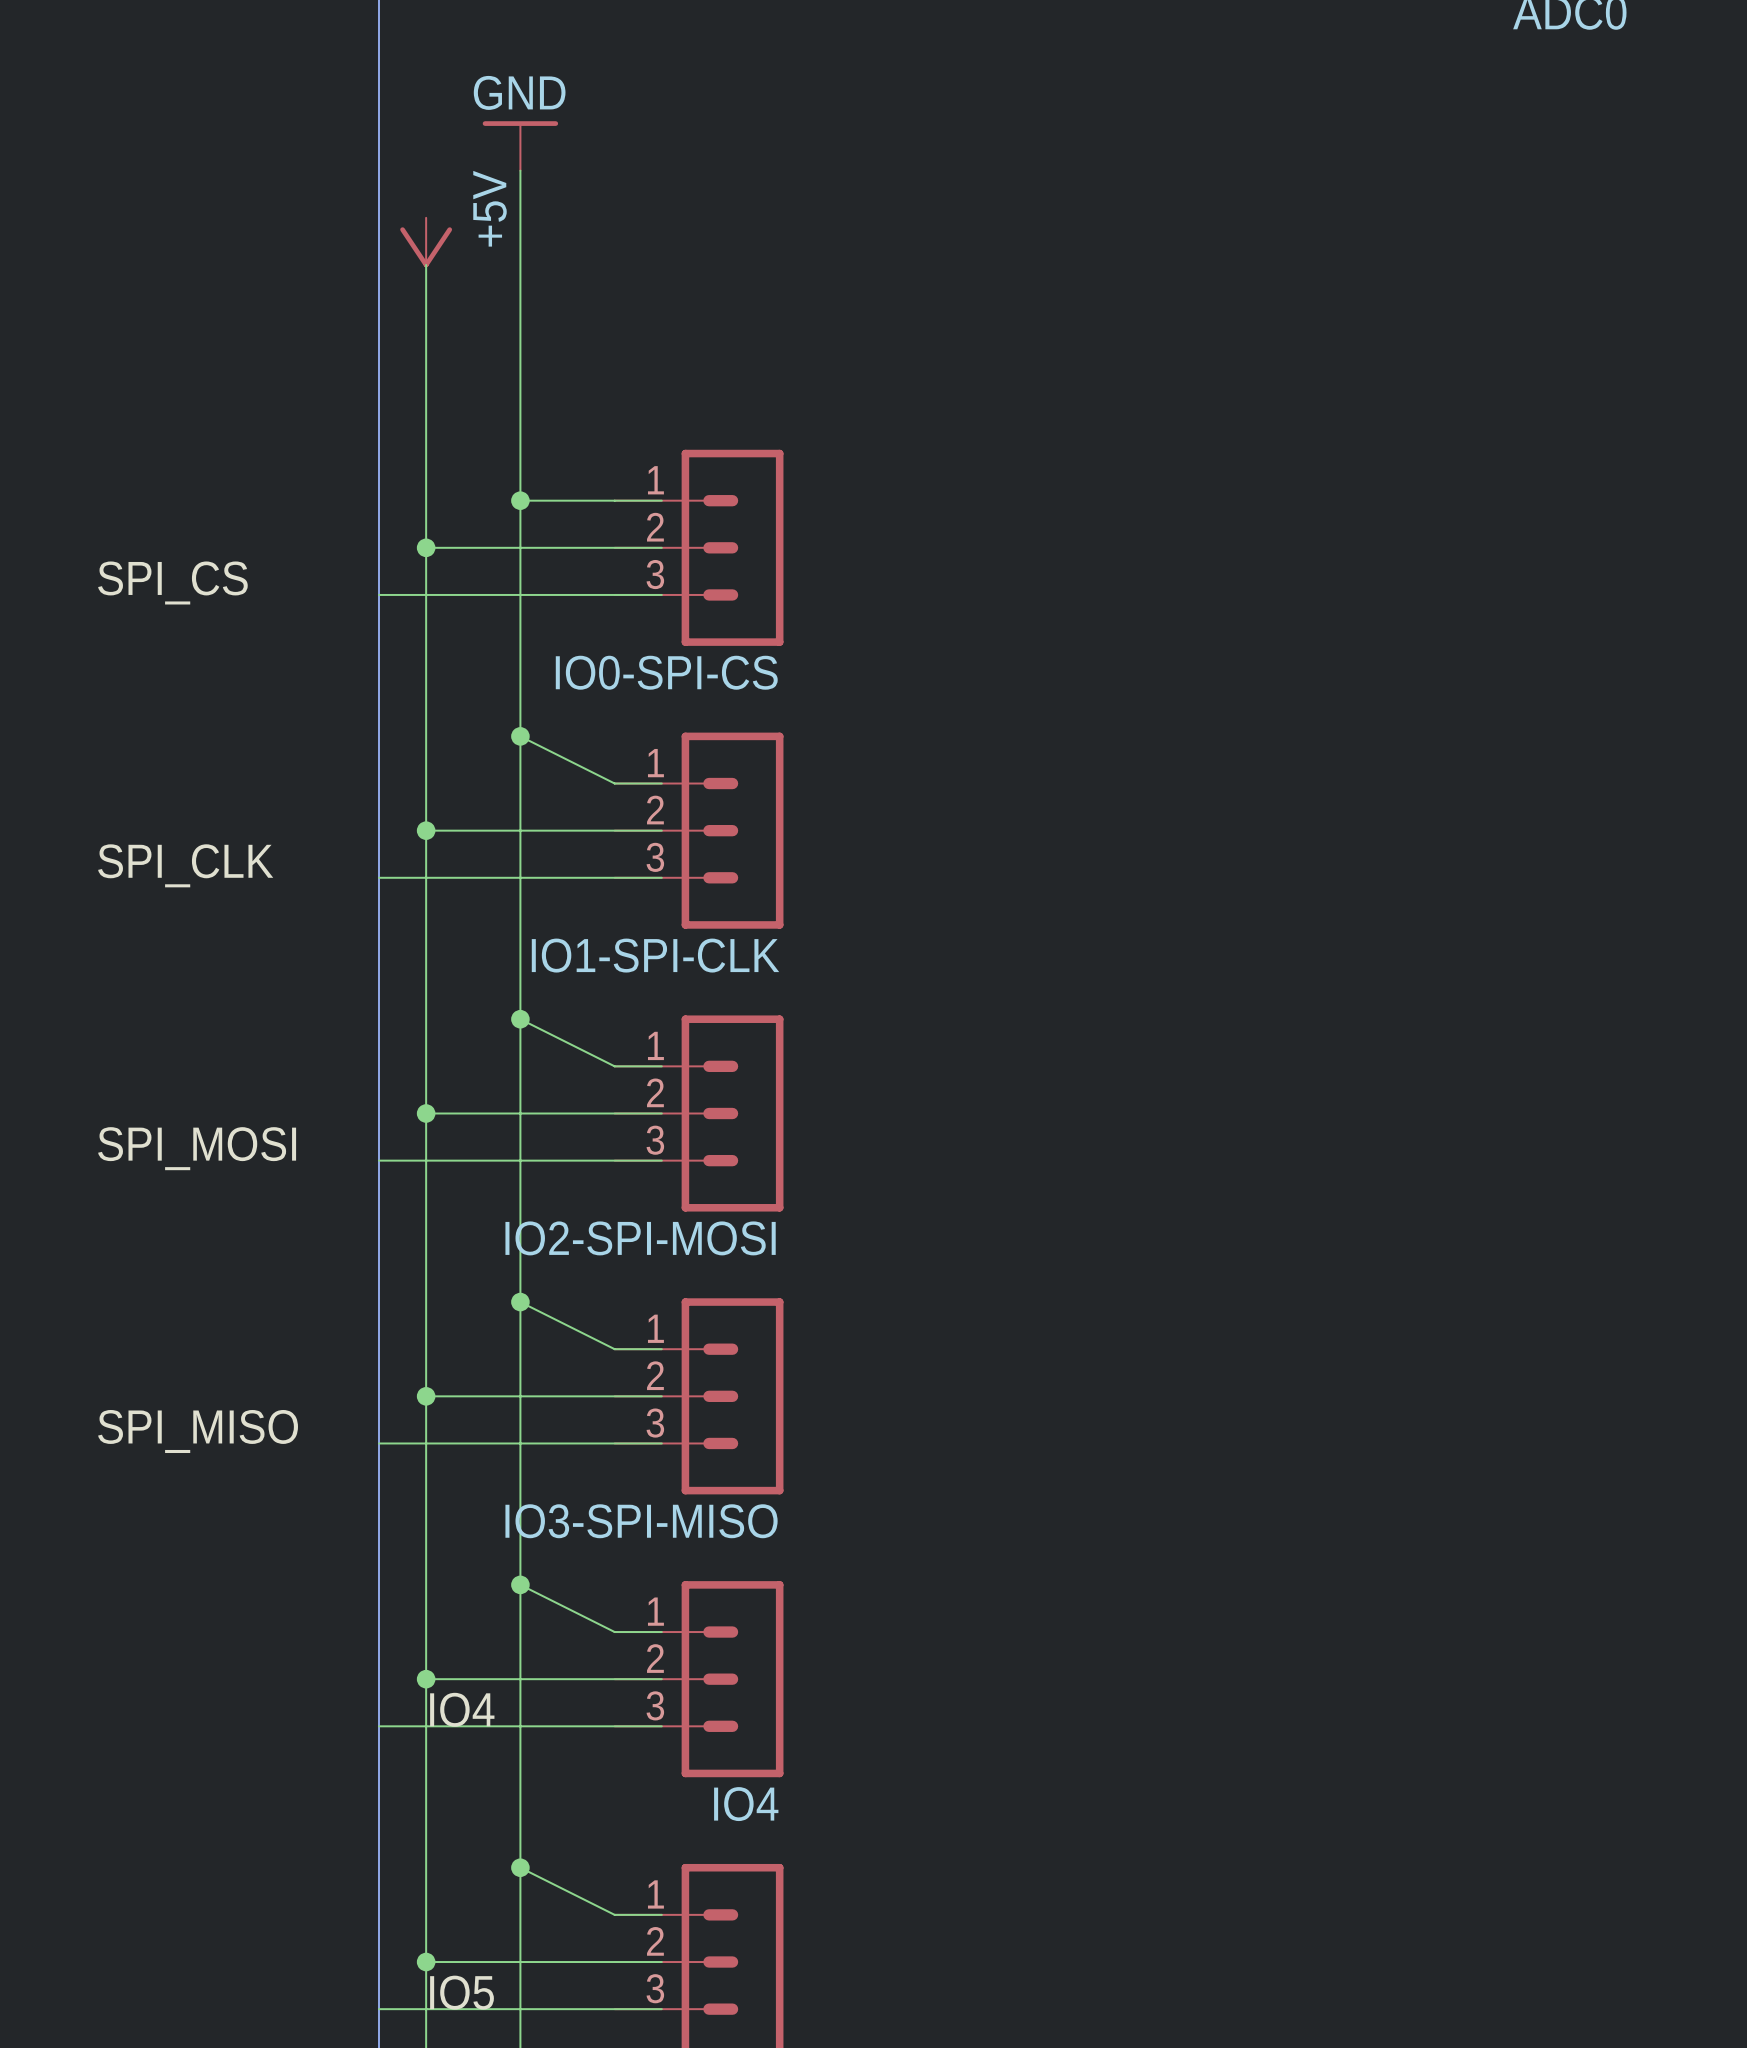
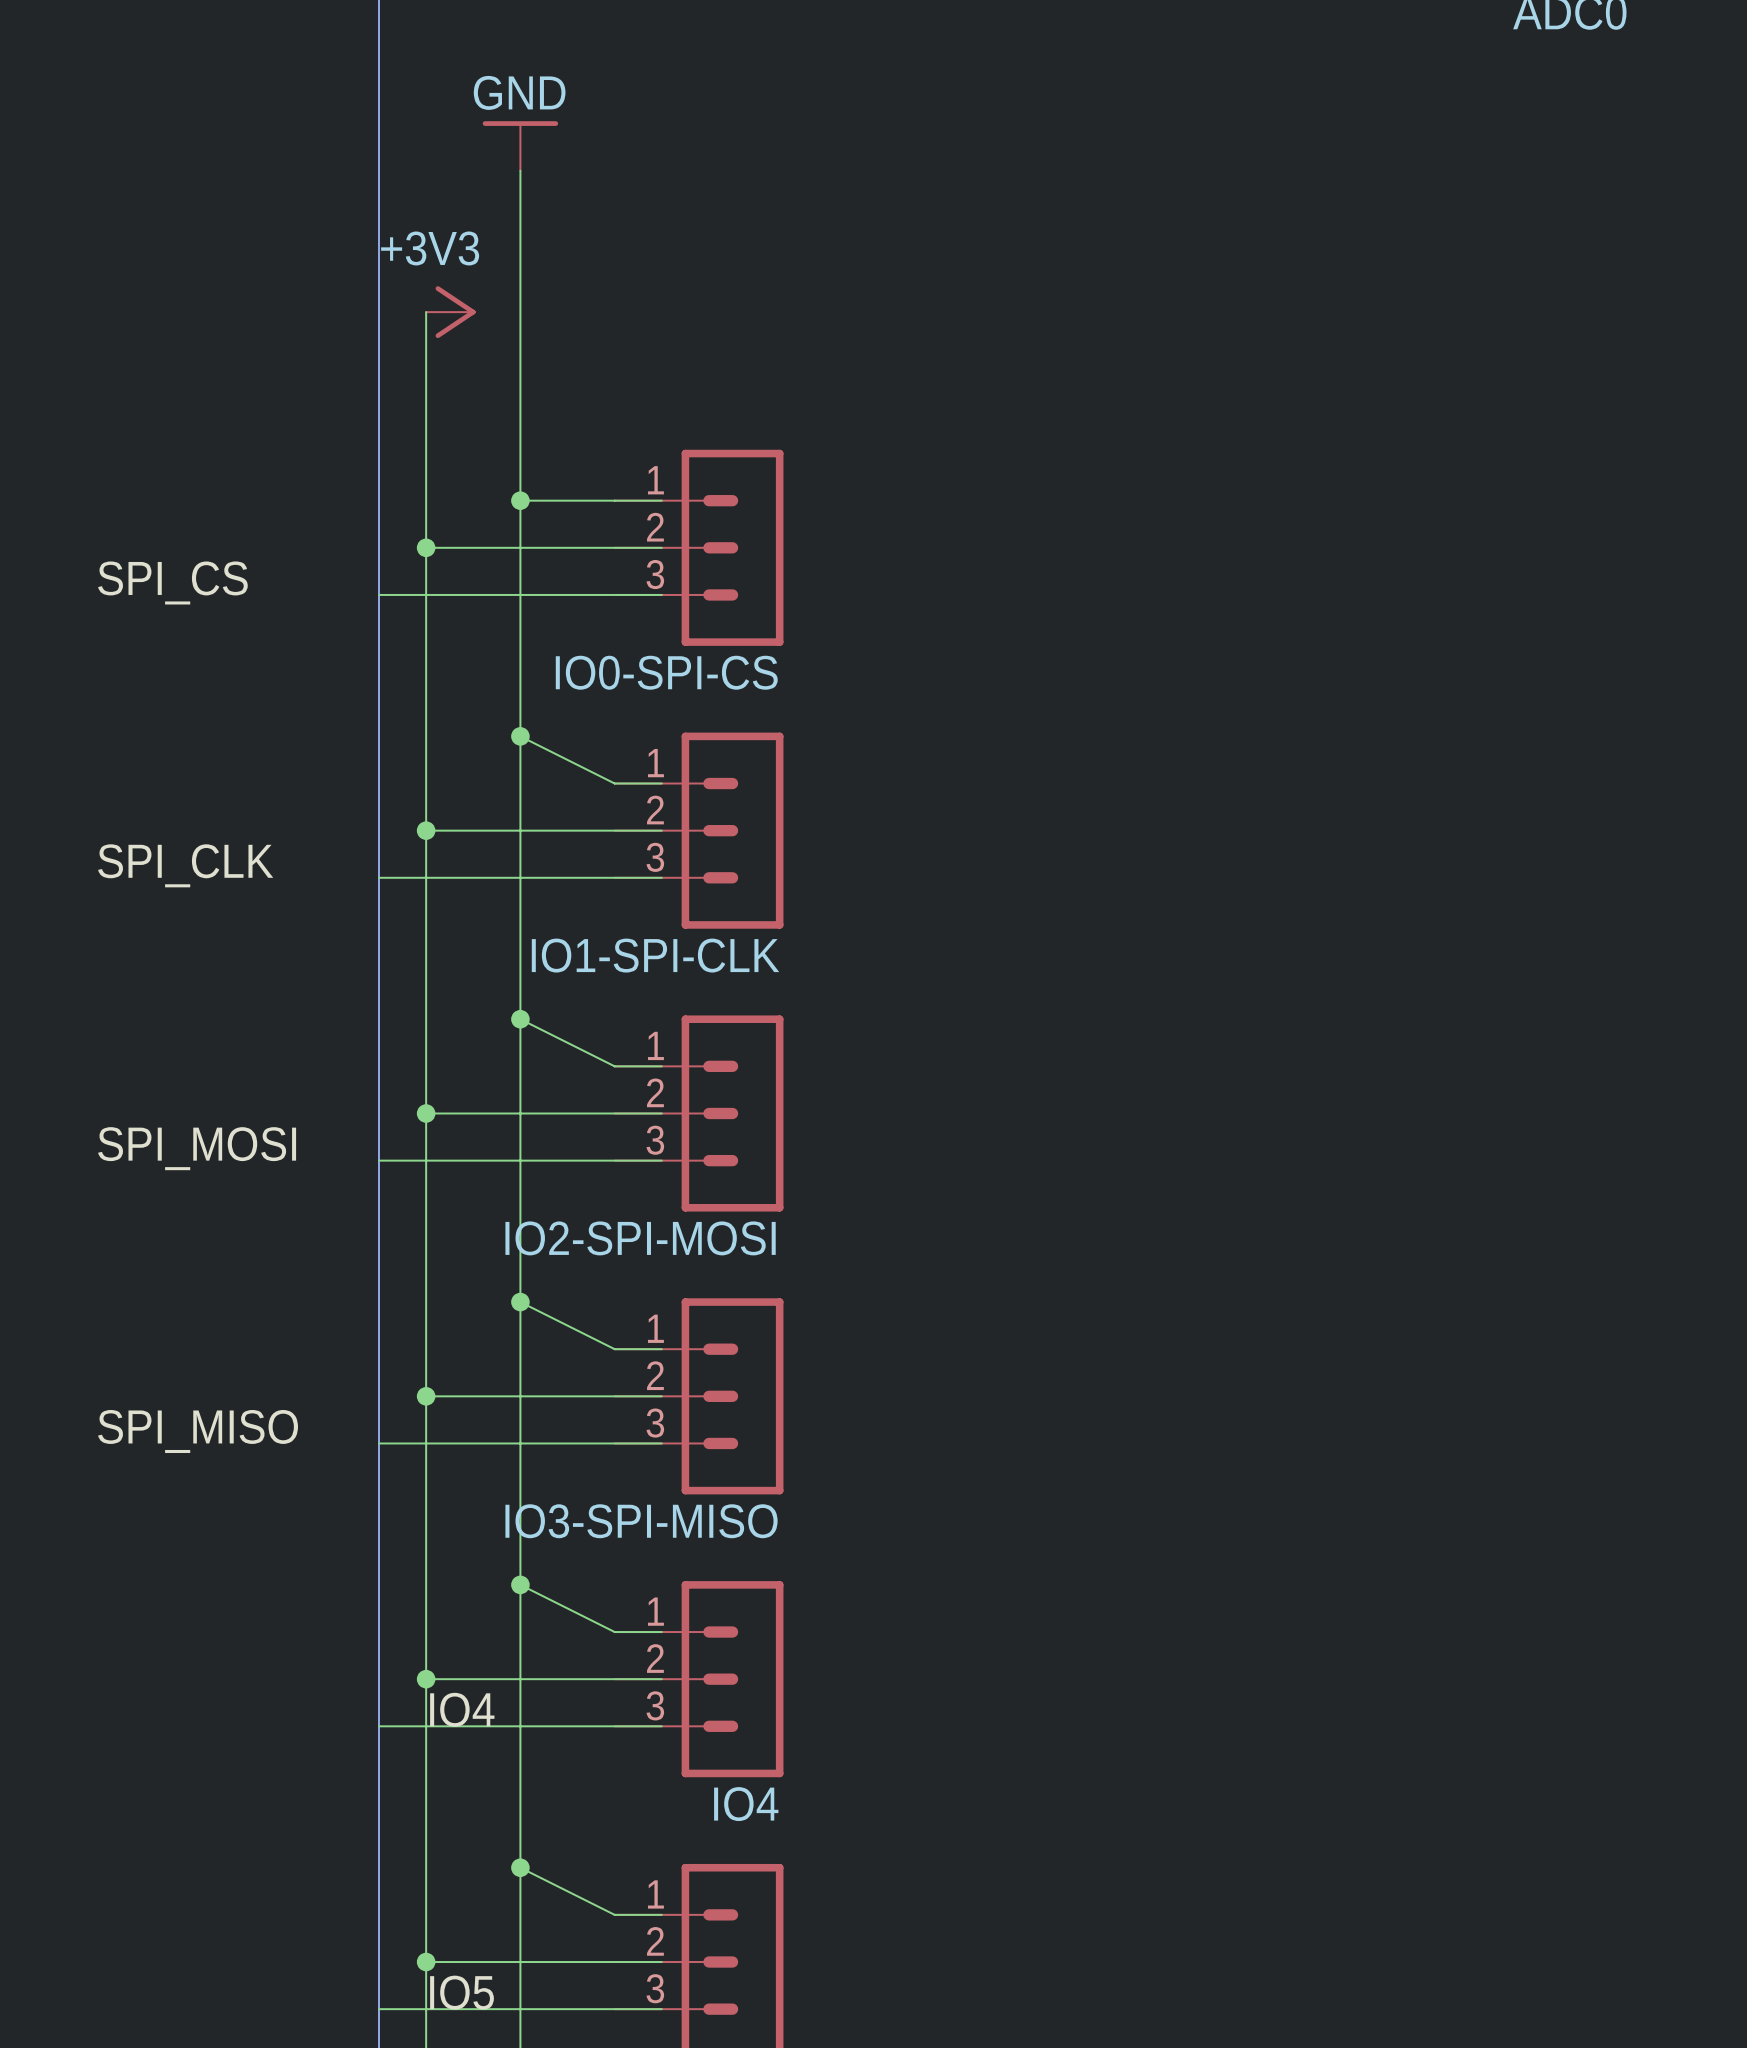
power symbol: +5V (426, 242) -> none
wire: (426, 264) (426, 312) -> none
power symbol: none -> +3V3 (450, 312)

